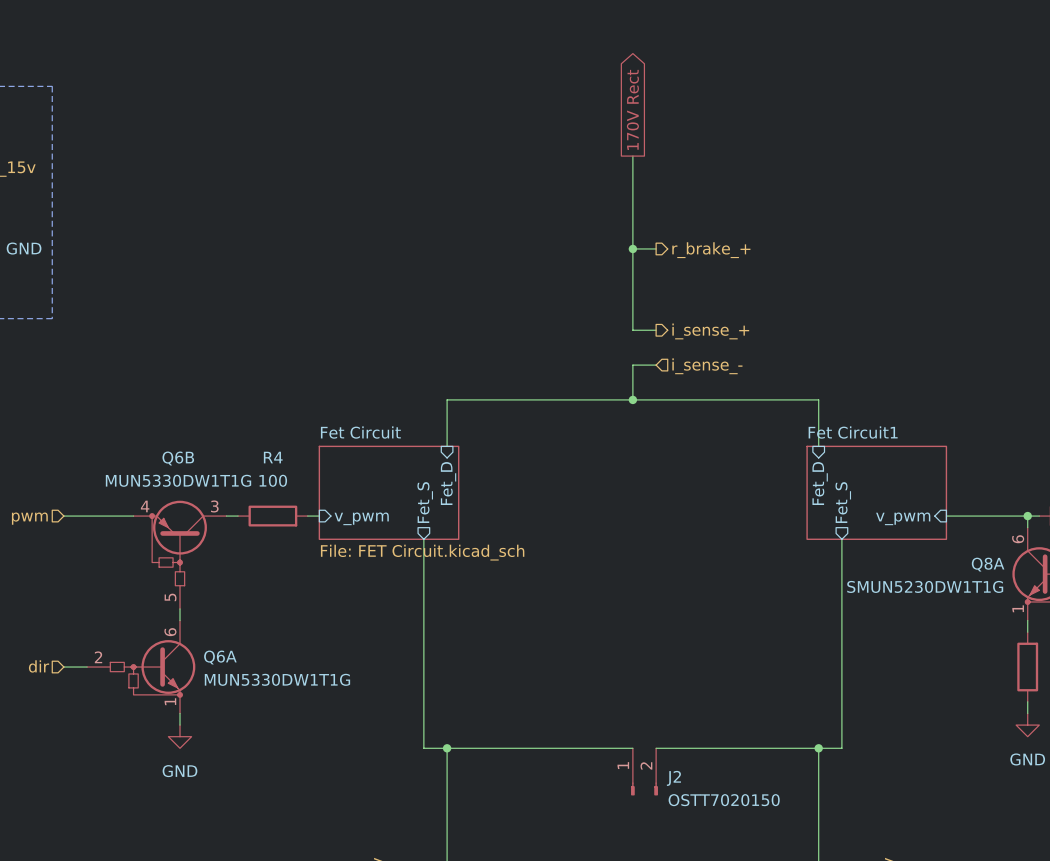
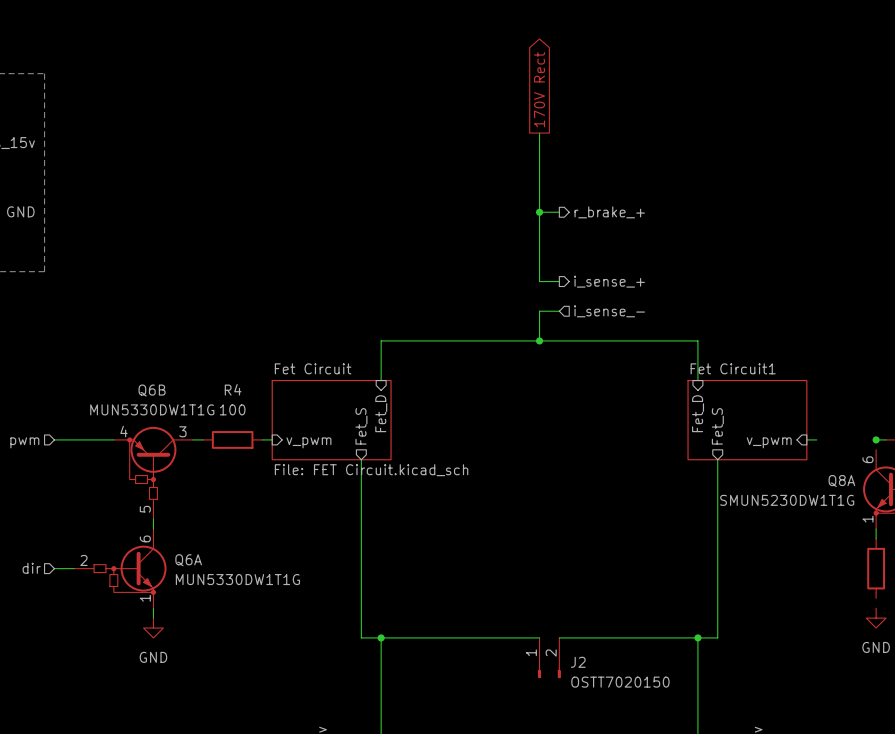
wire: (958, 516) (1027, 516) (1027, 527) -> none
wire: (1027, 701) (1027, 713) -> none

